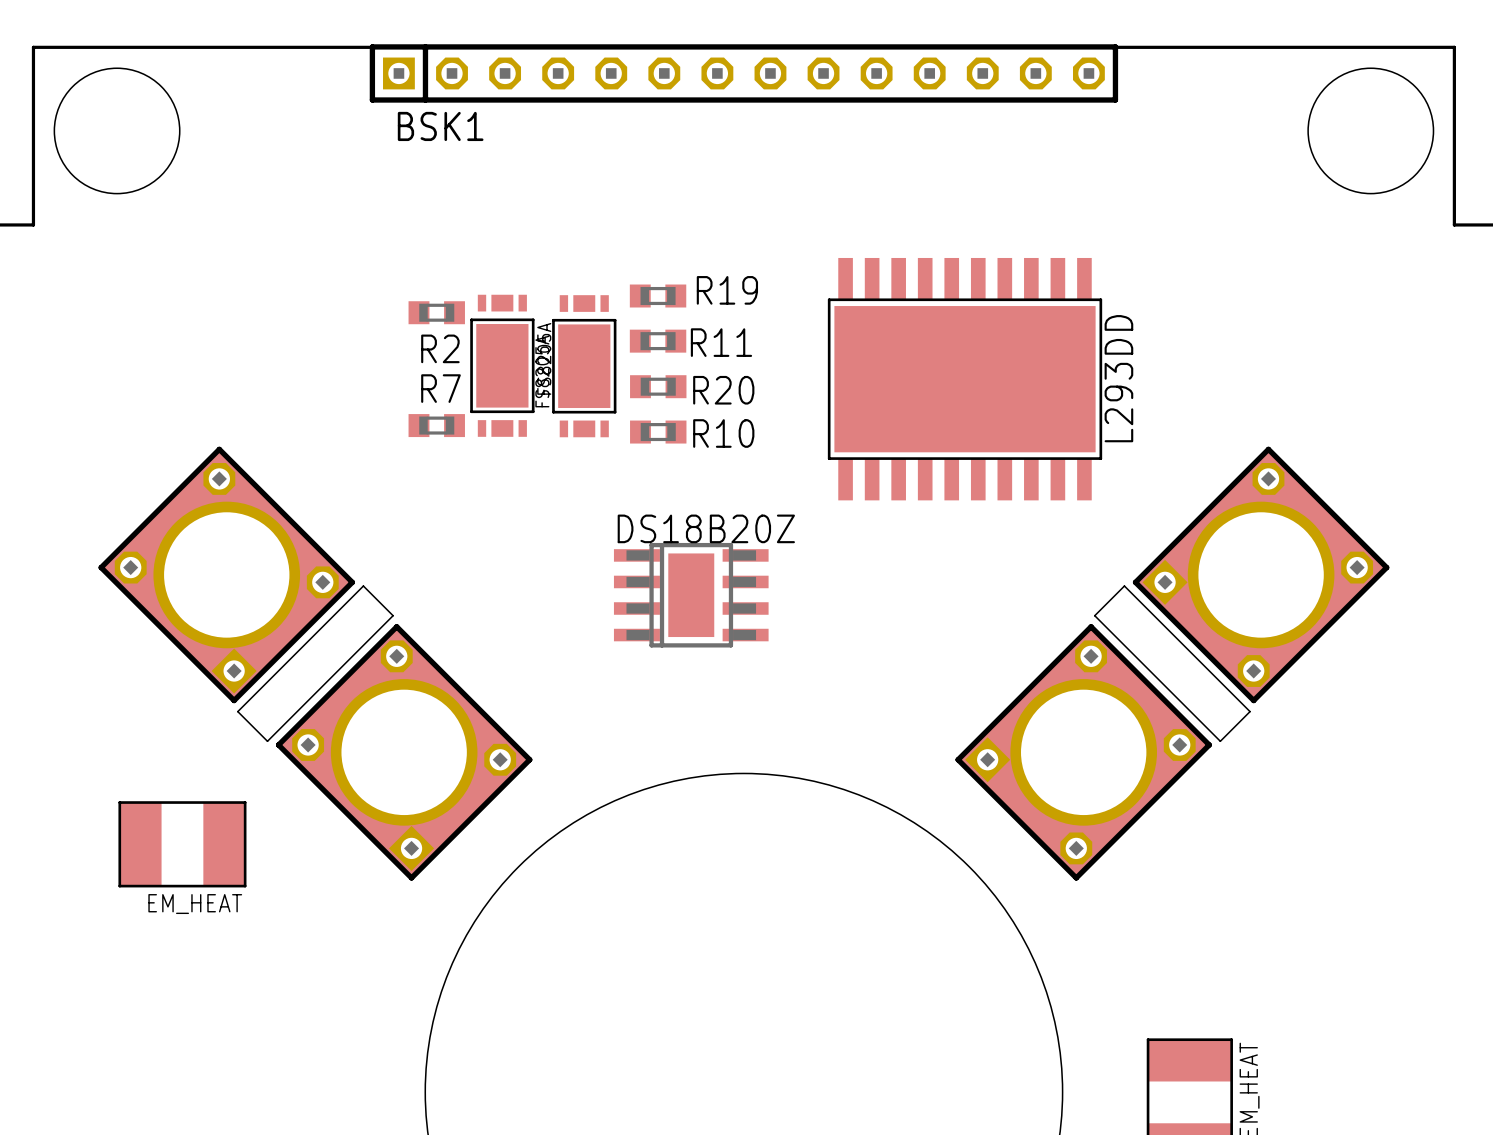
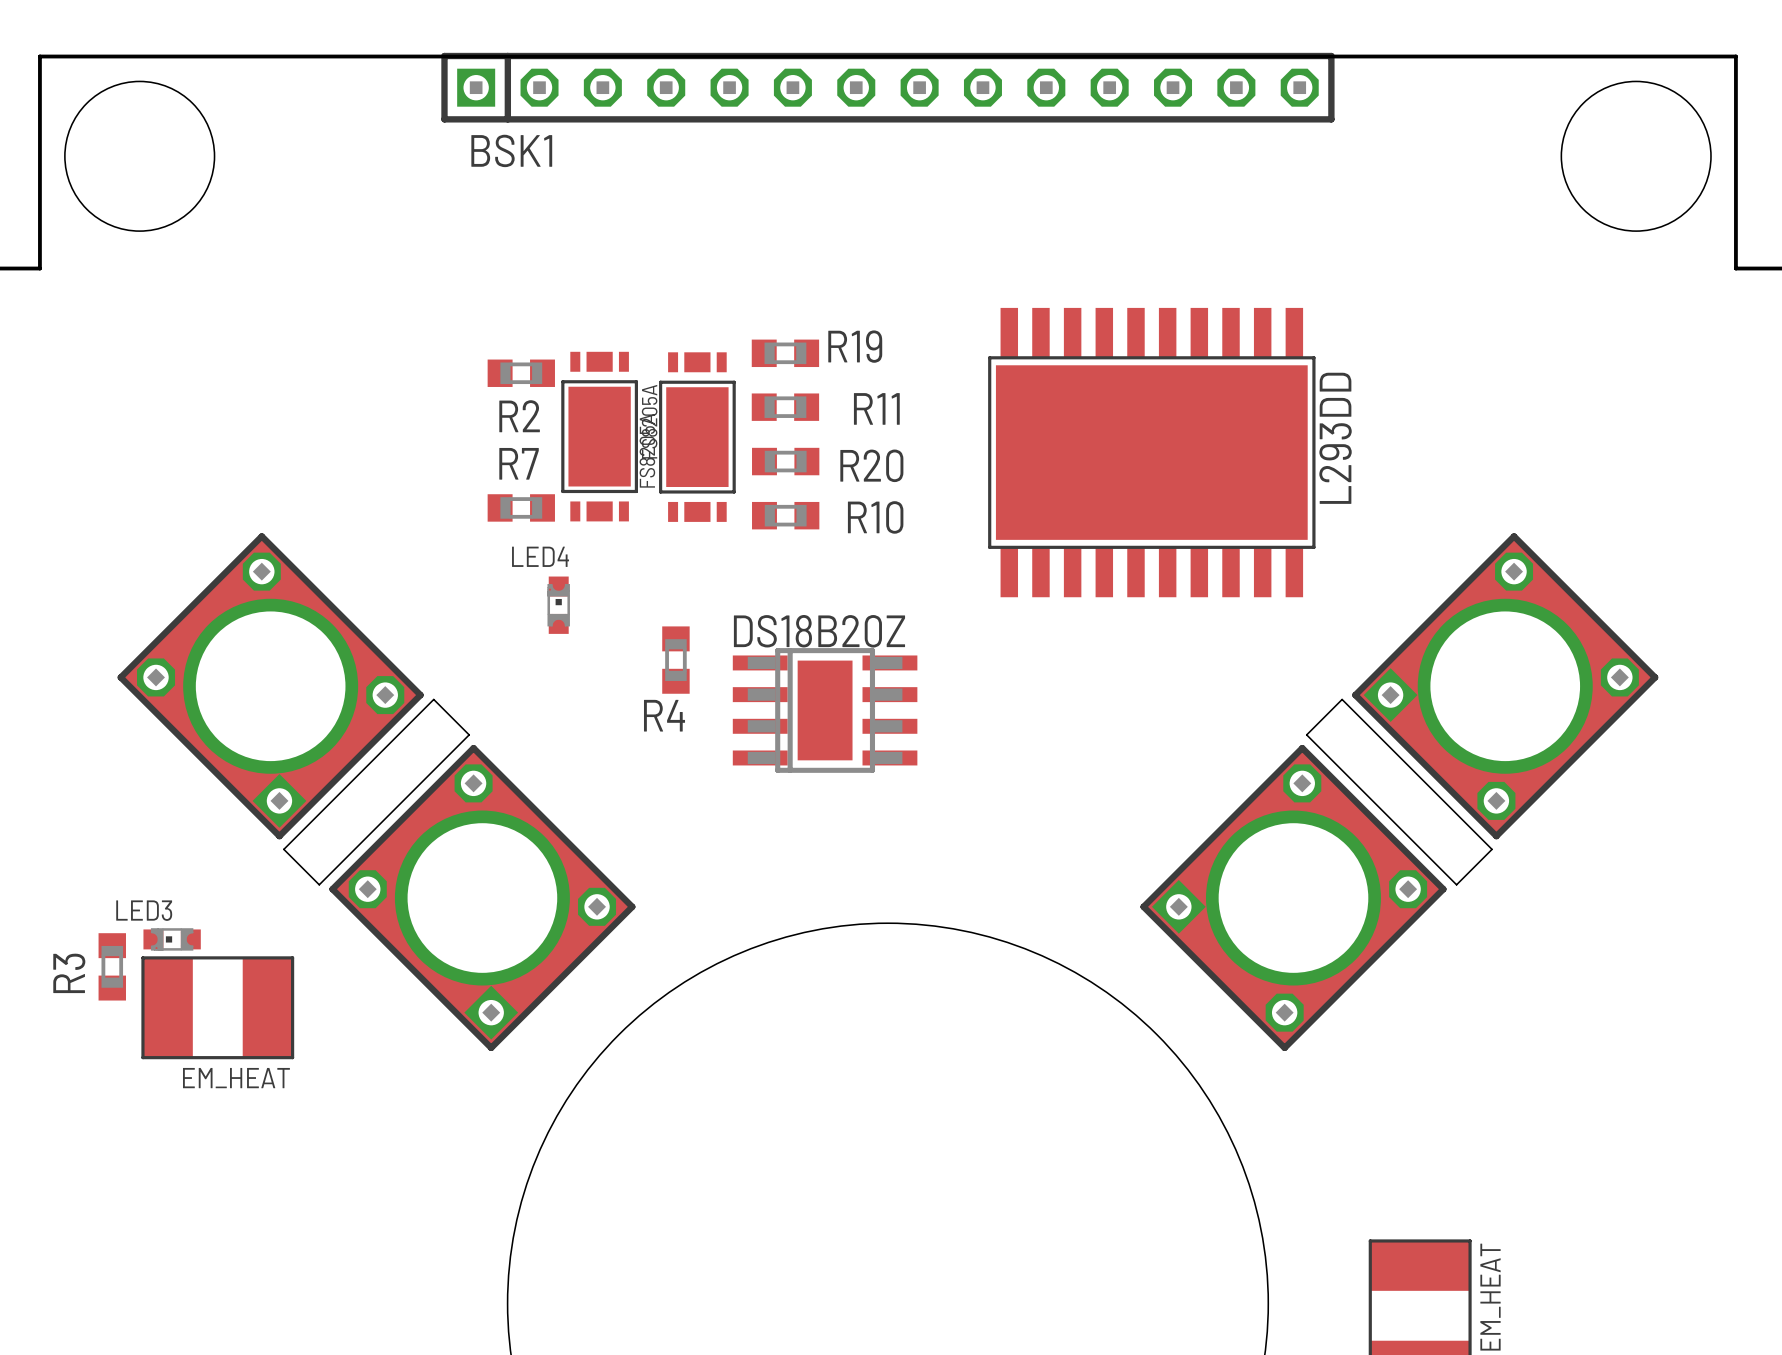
LED4: none -> (558, 605)
R4: none -> (675, 660)
LED3: none -> (172, 939)
R3: none -> (112, 966)

